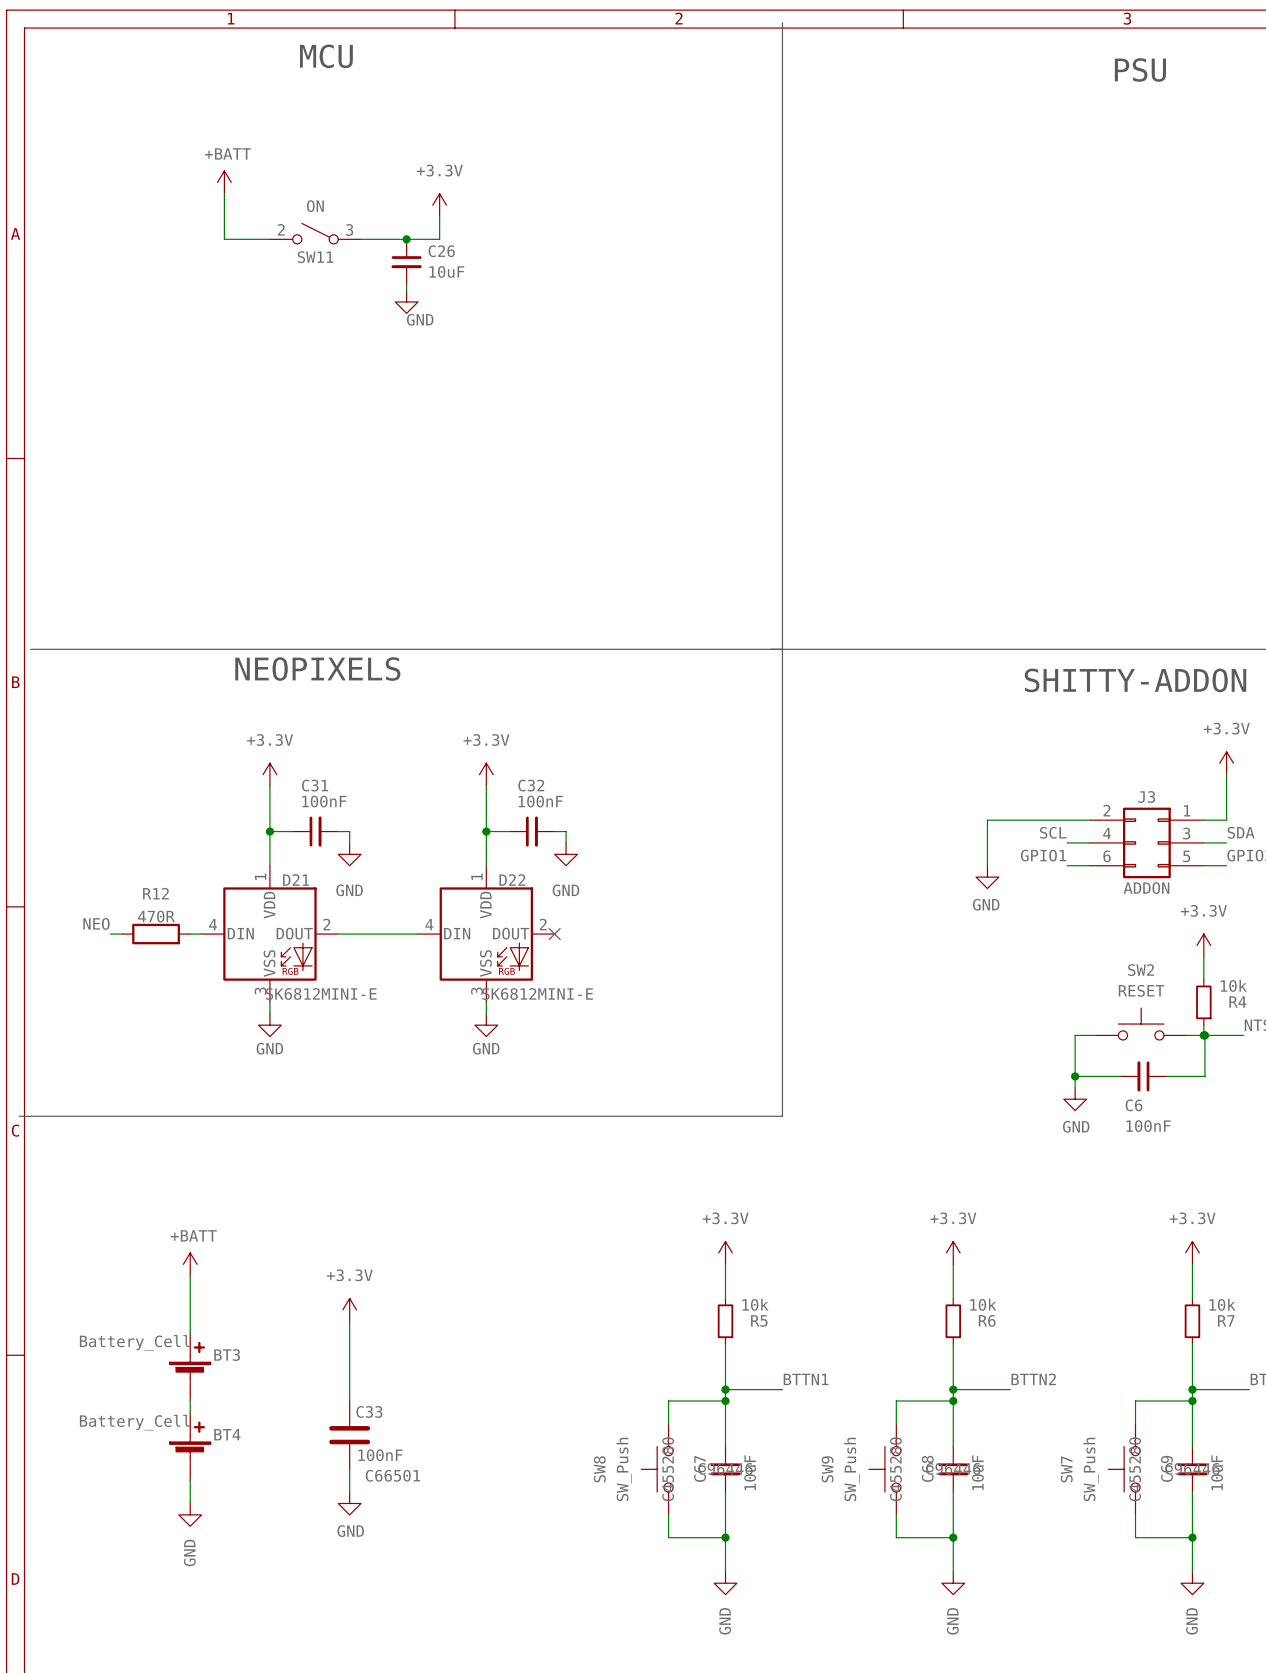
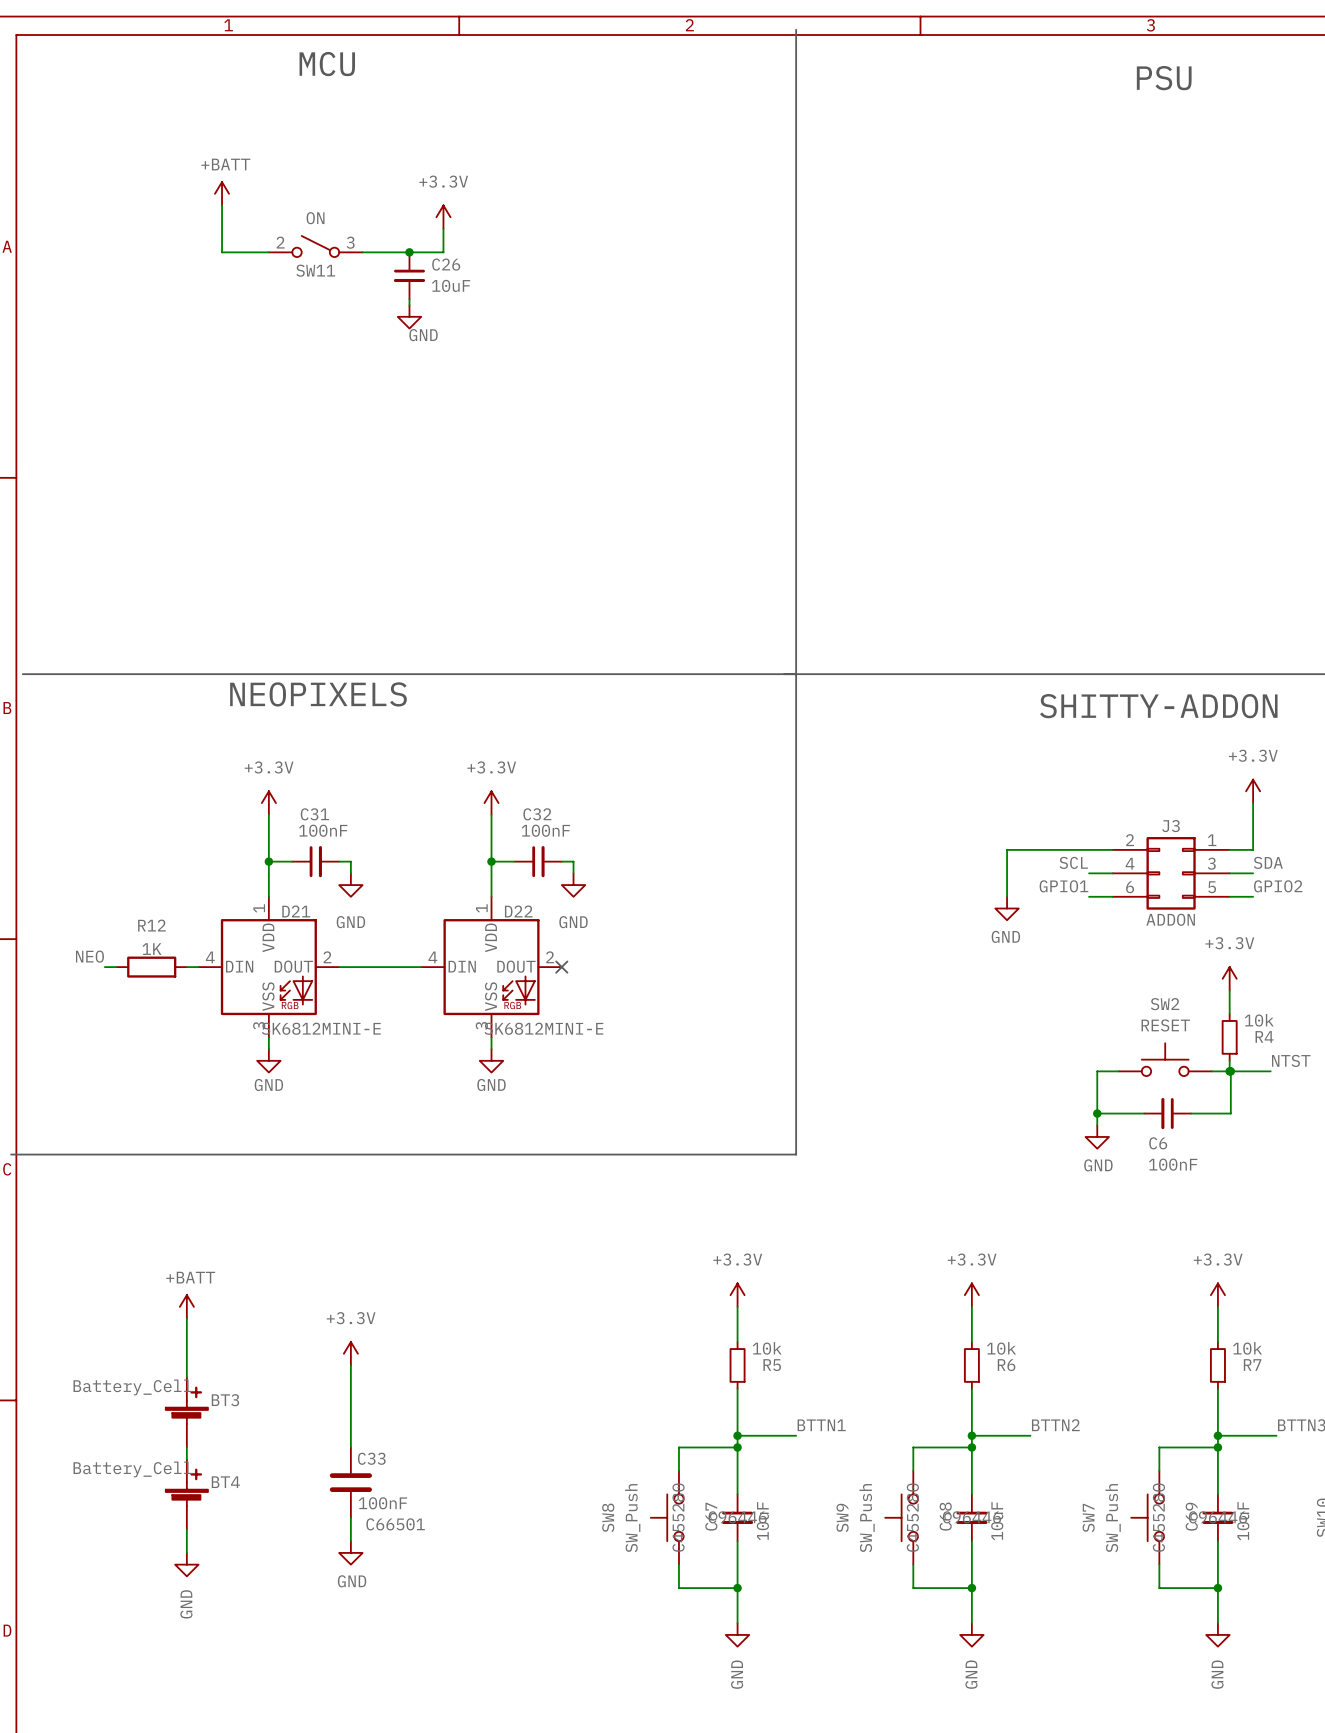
R12 value: 470R (156, 916) -> 1K (151, 949)

